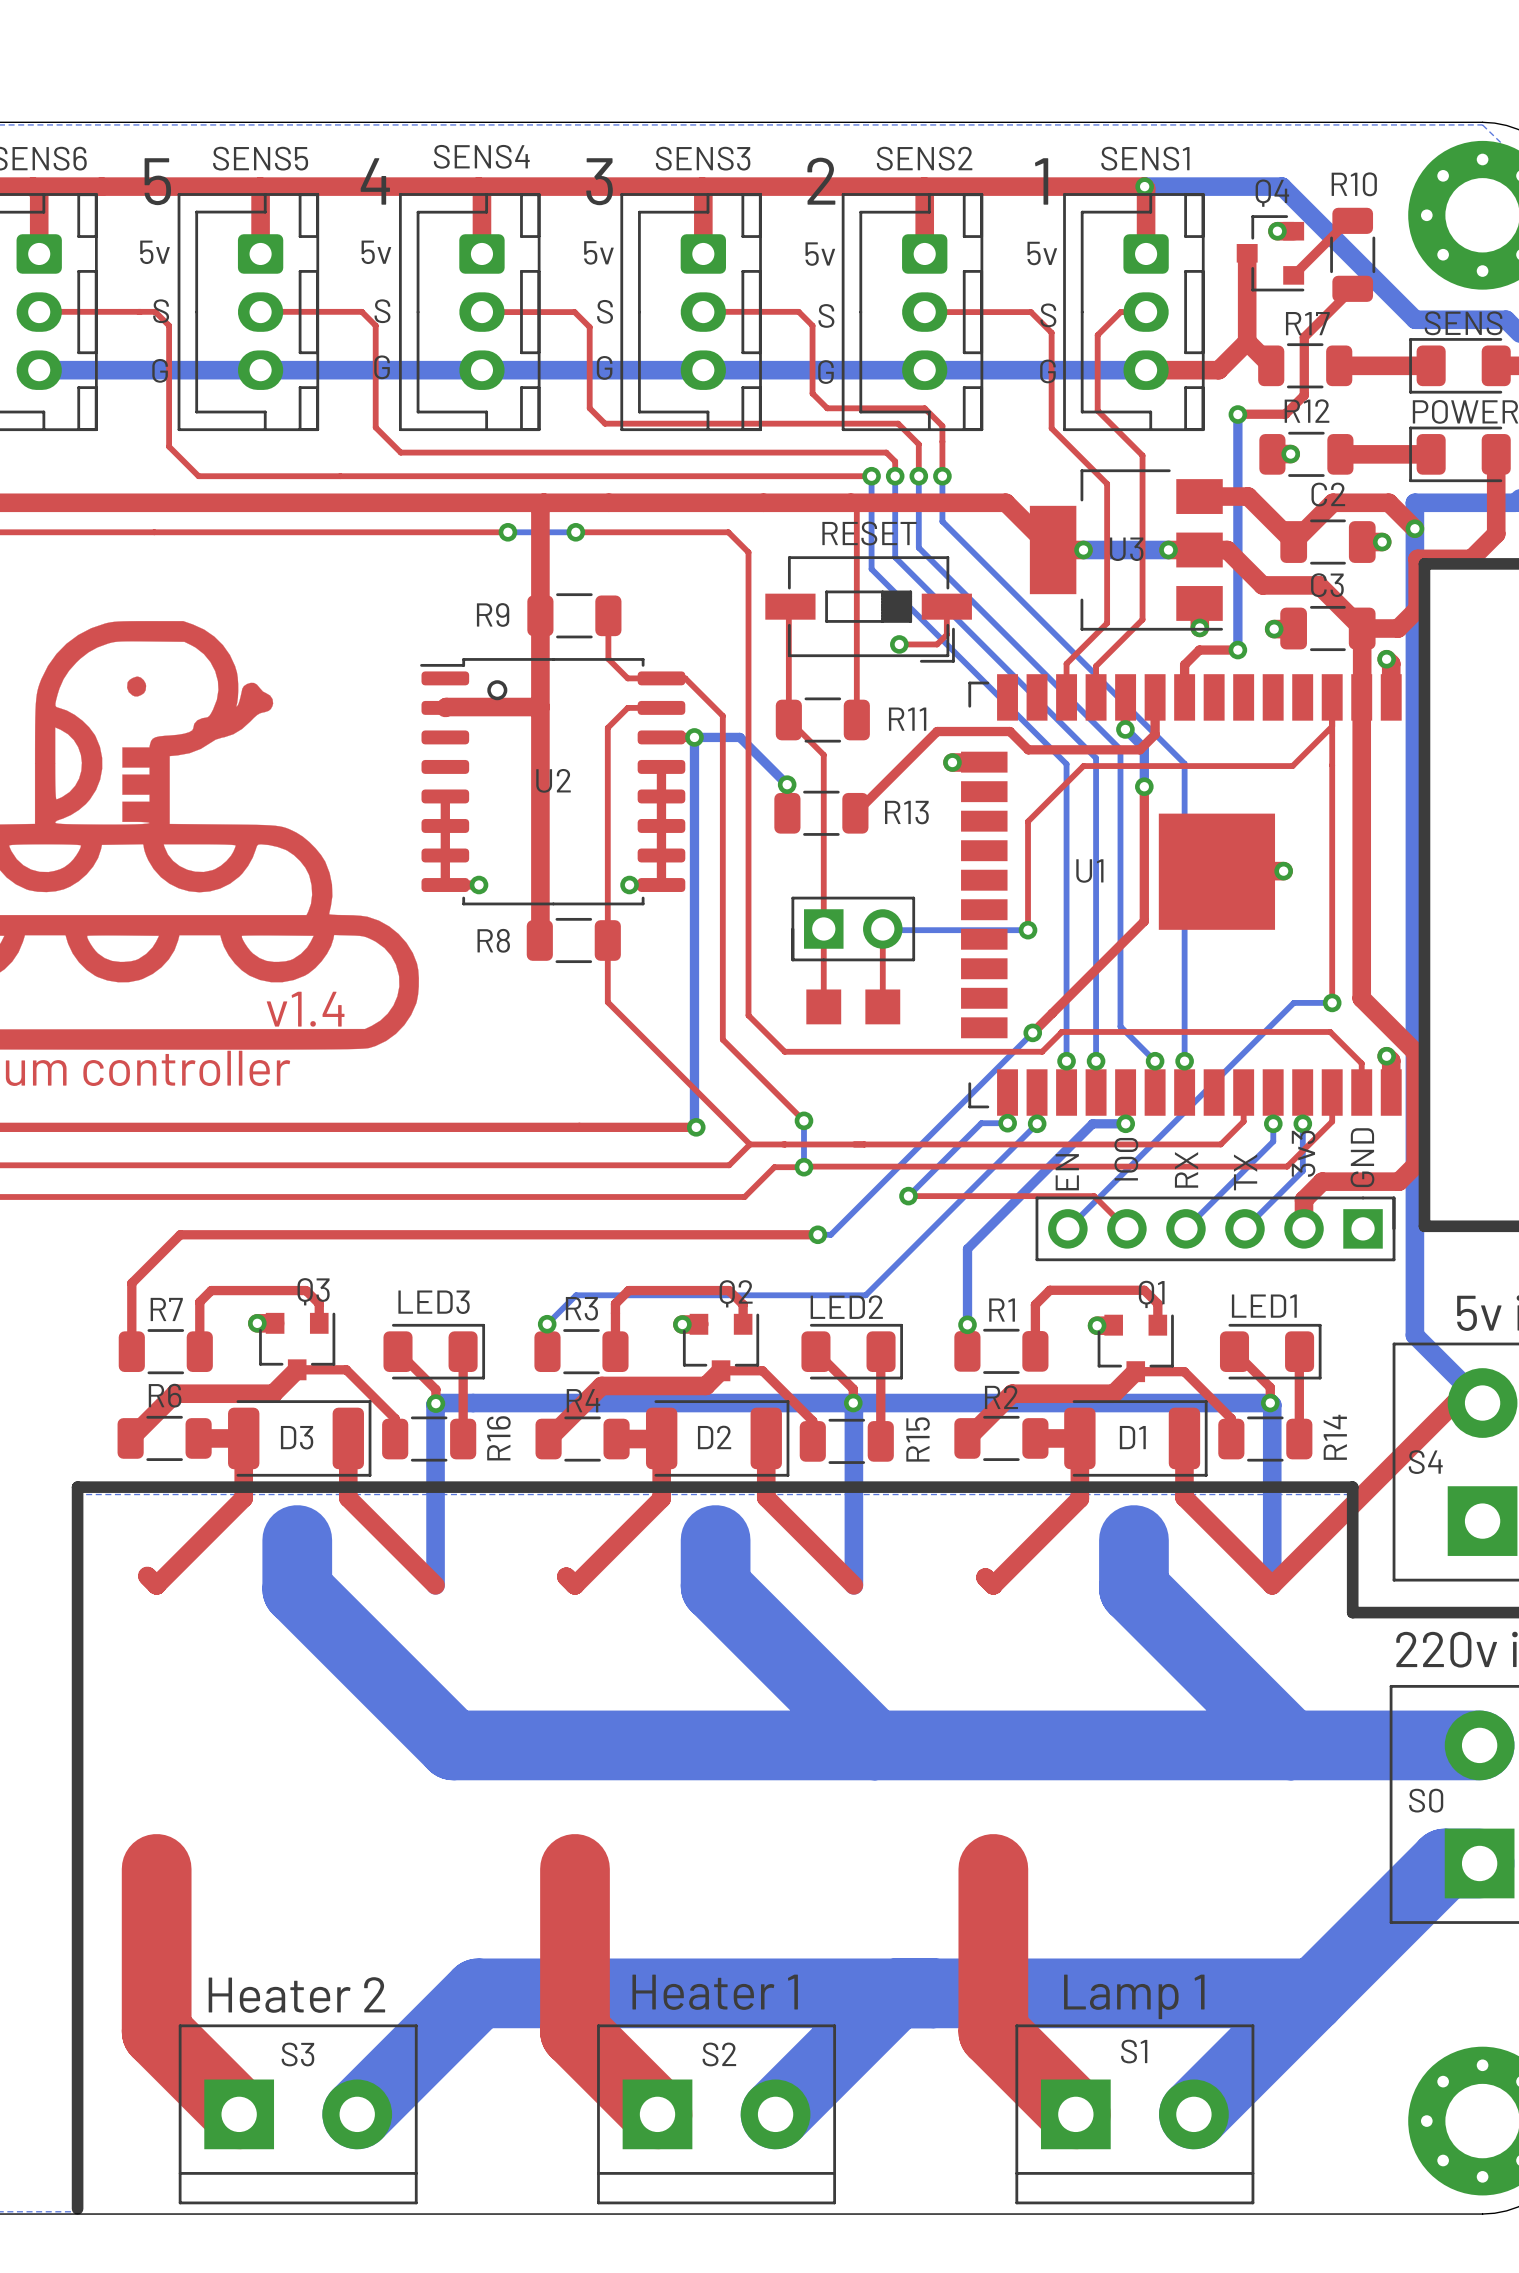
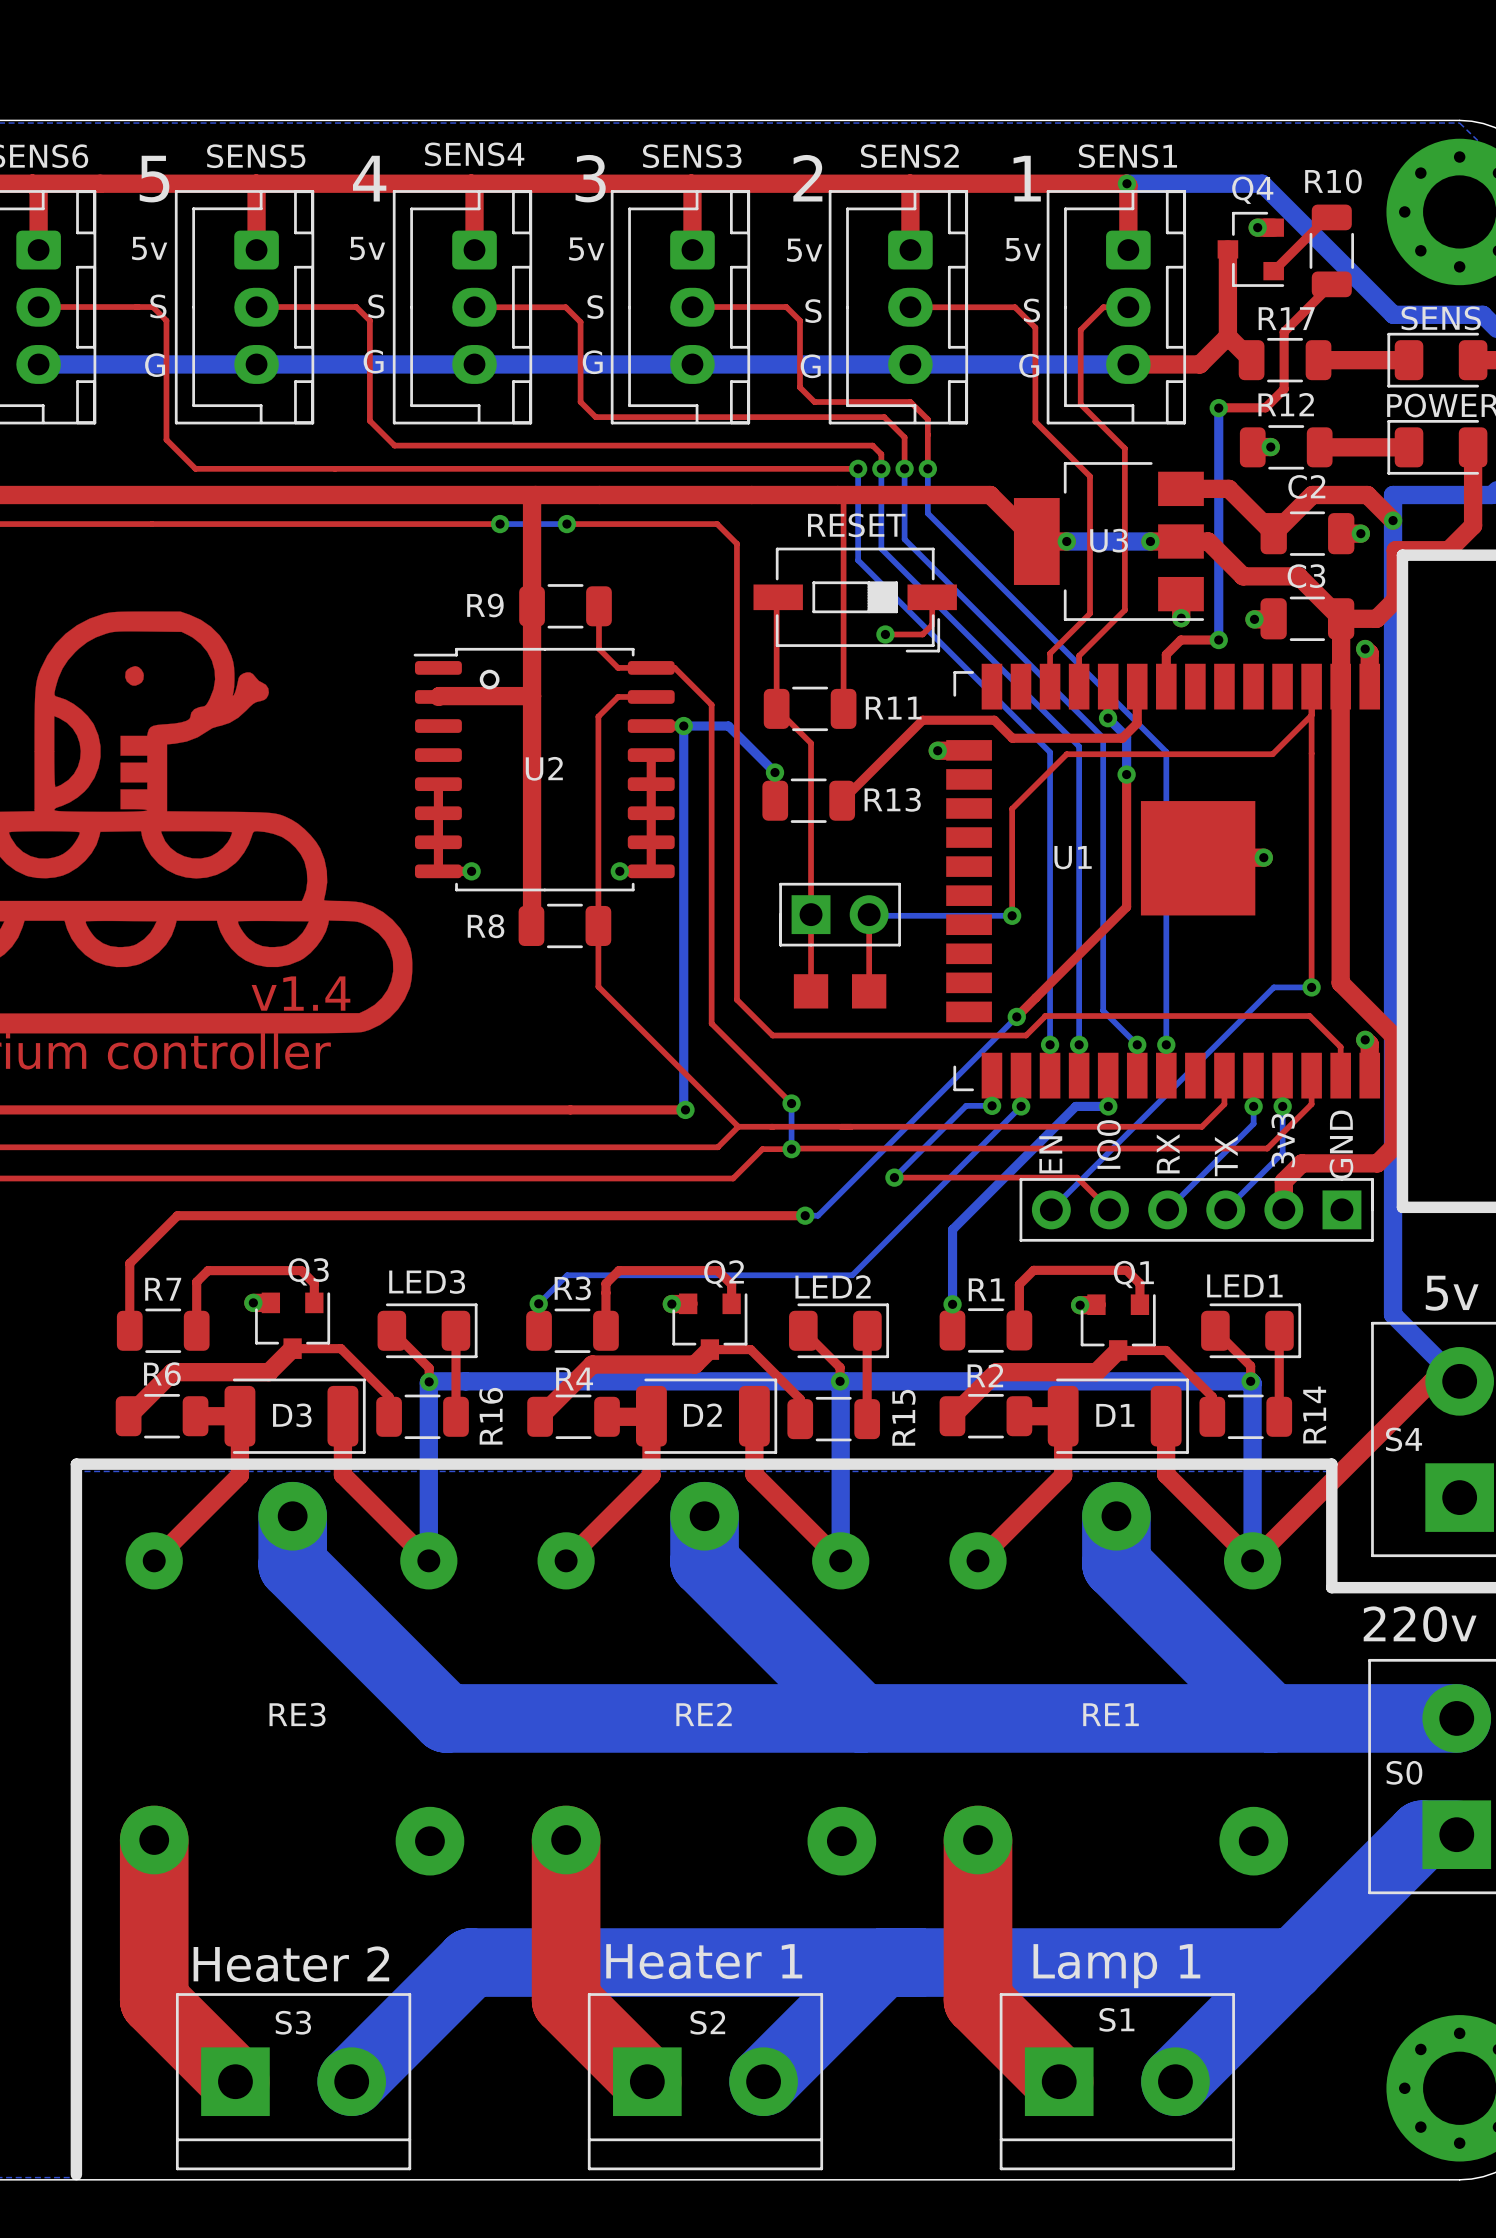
RE3: none -> (292, 1678)
RE2: none -> (703, 1678)
RE1: none -> (1115, 1678)

